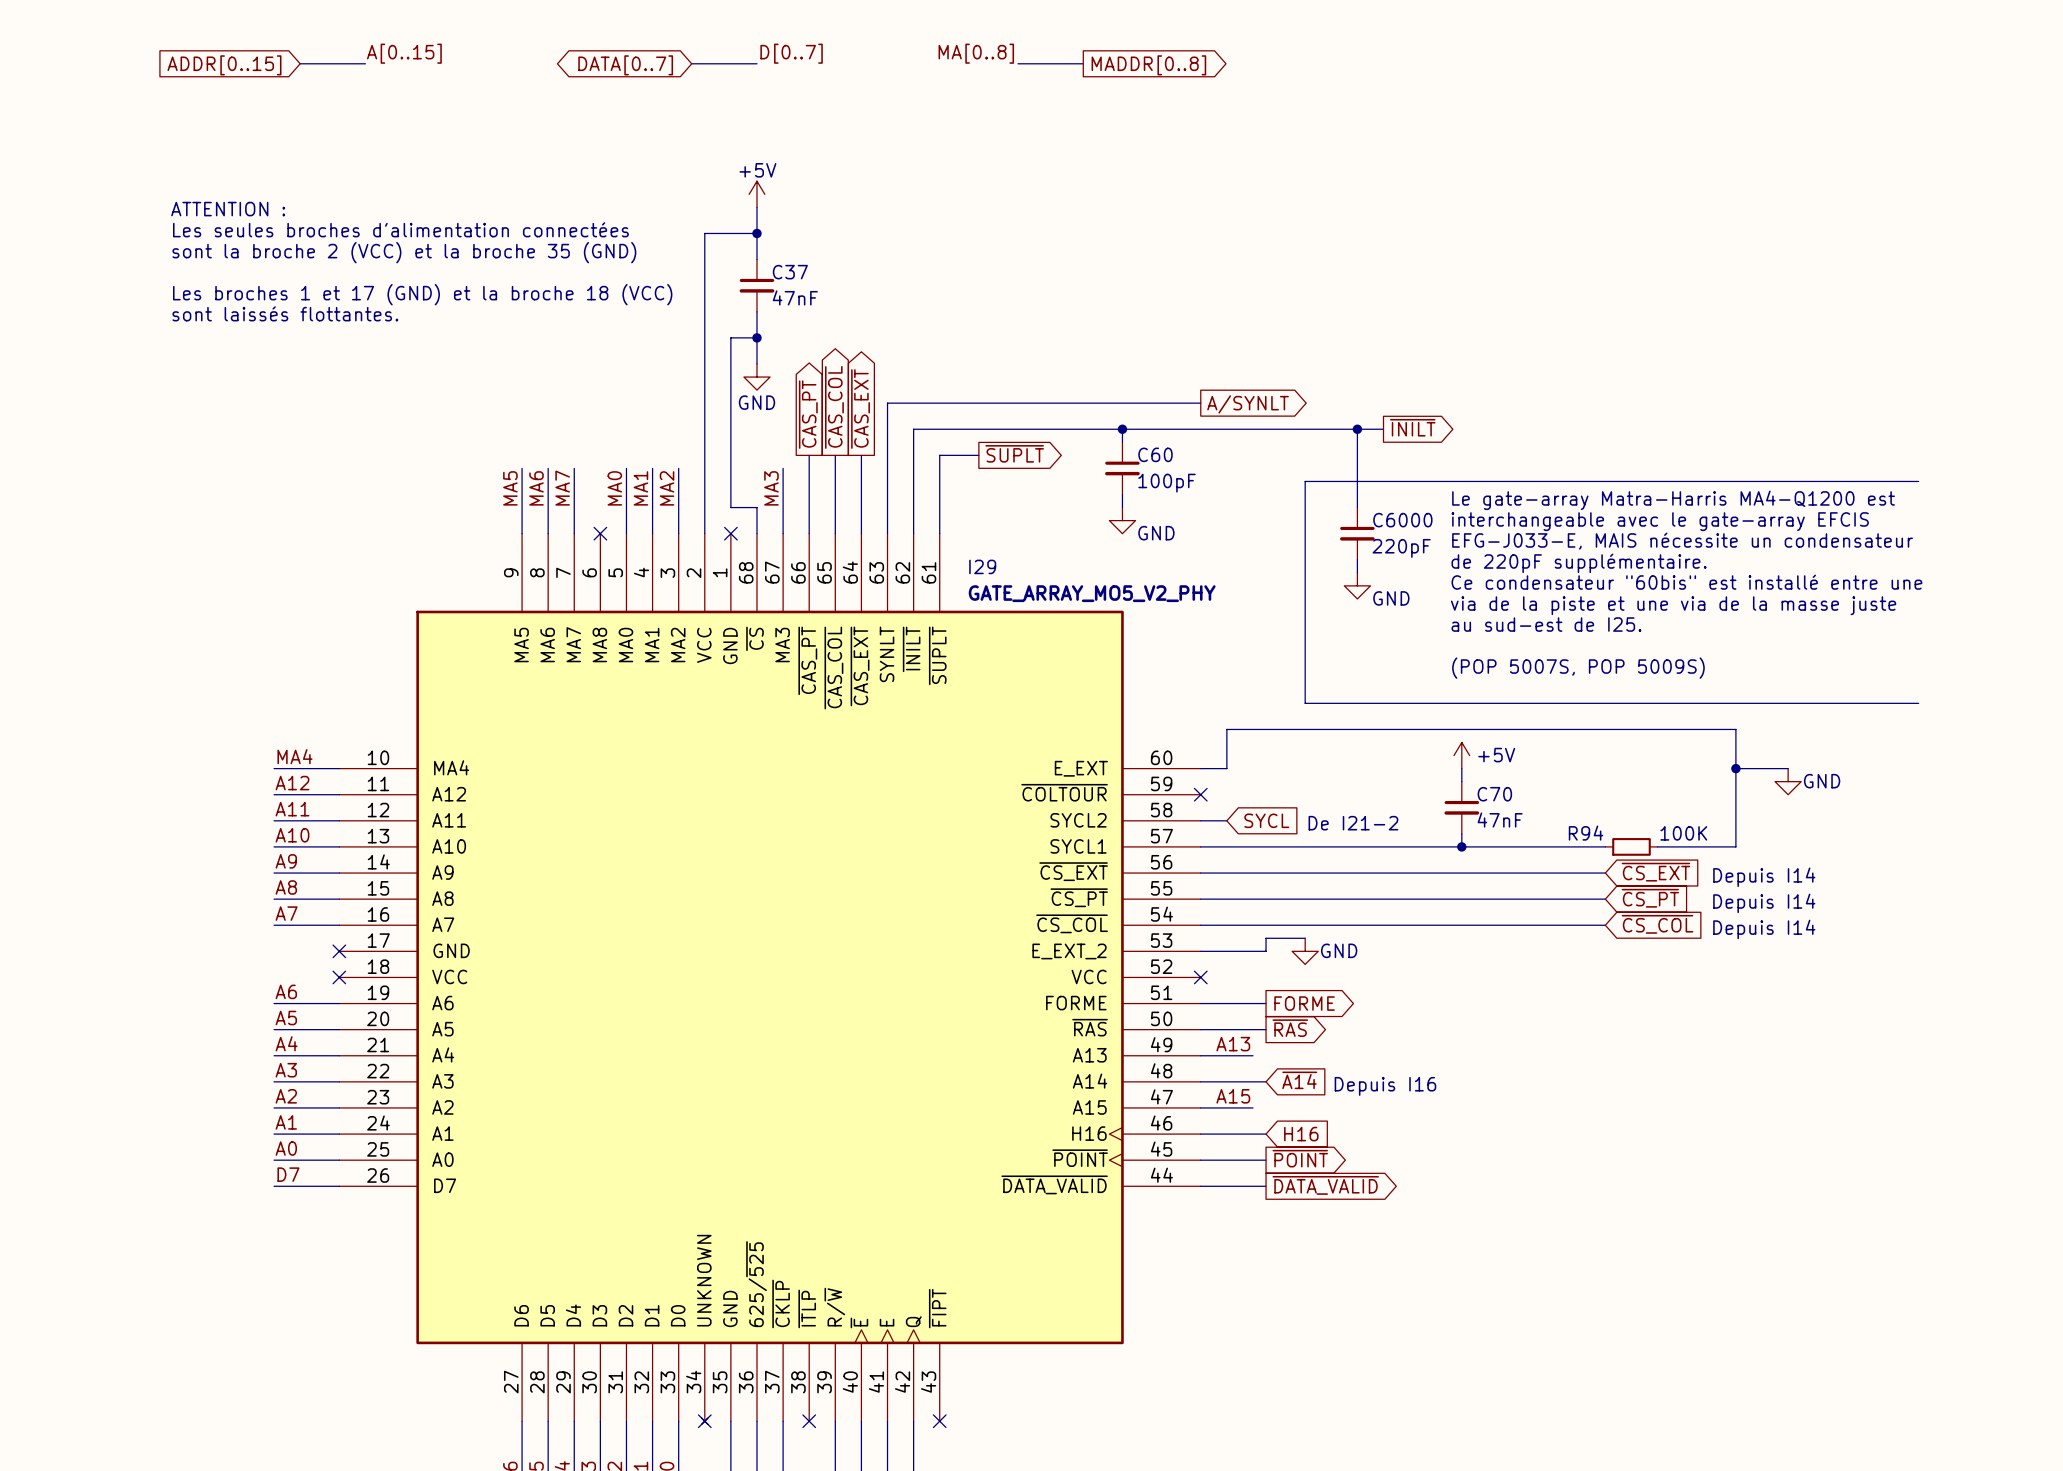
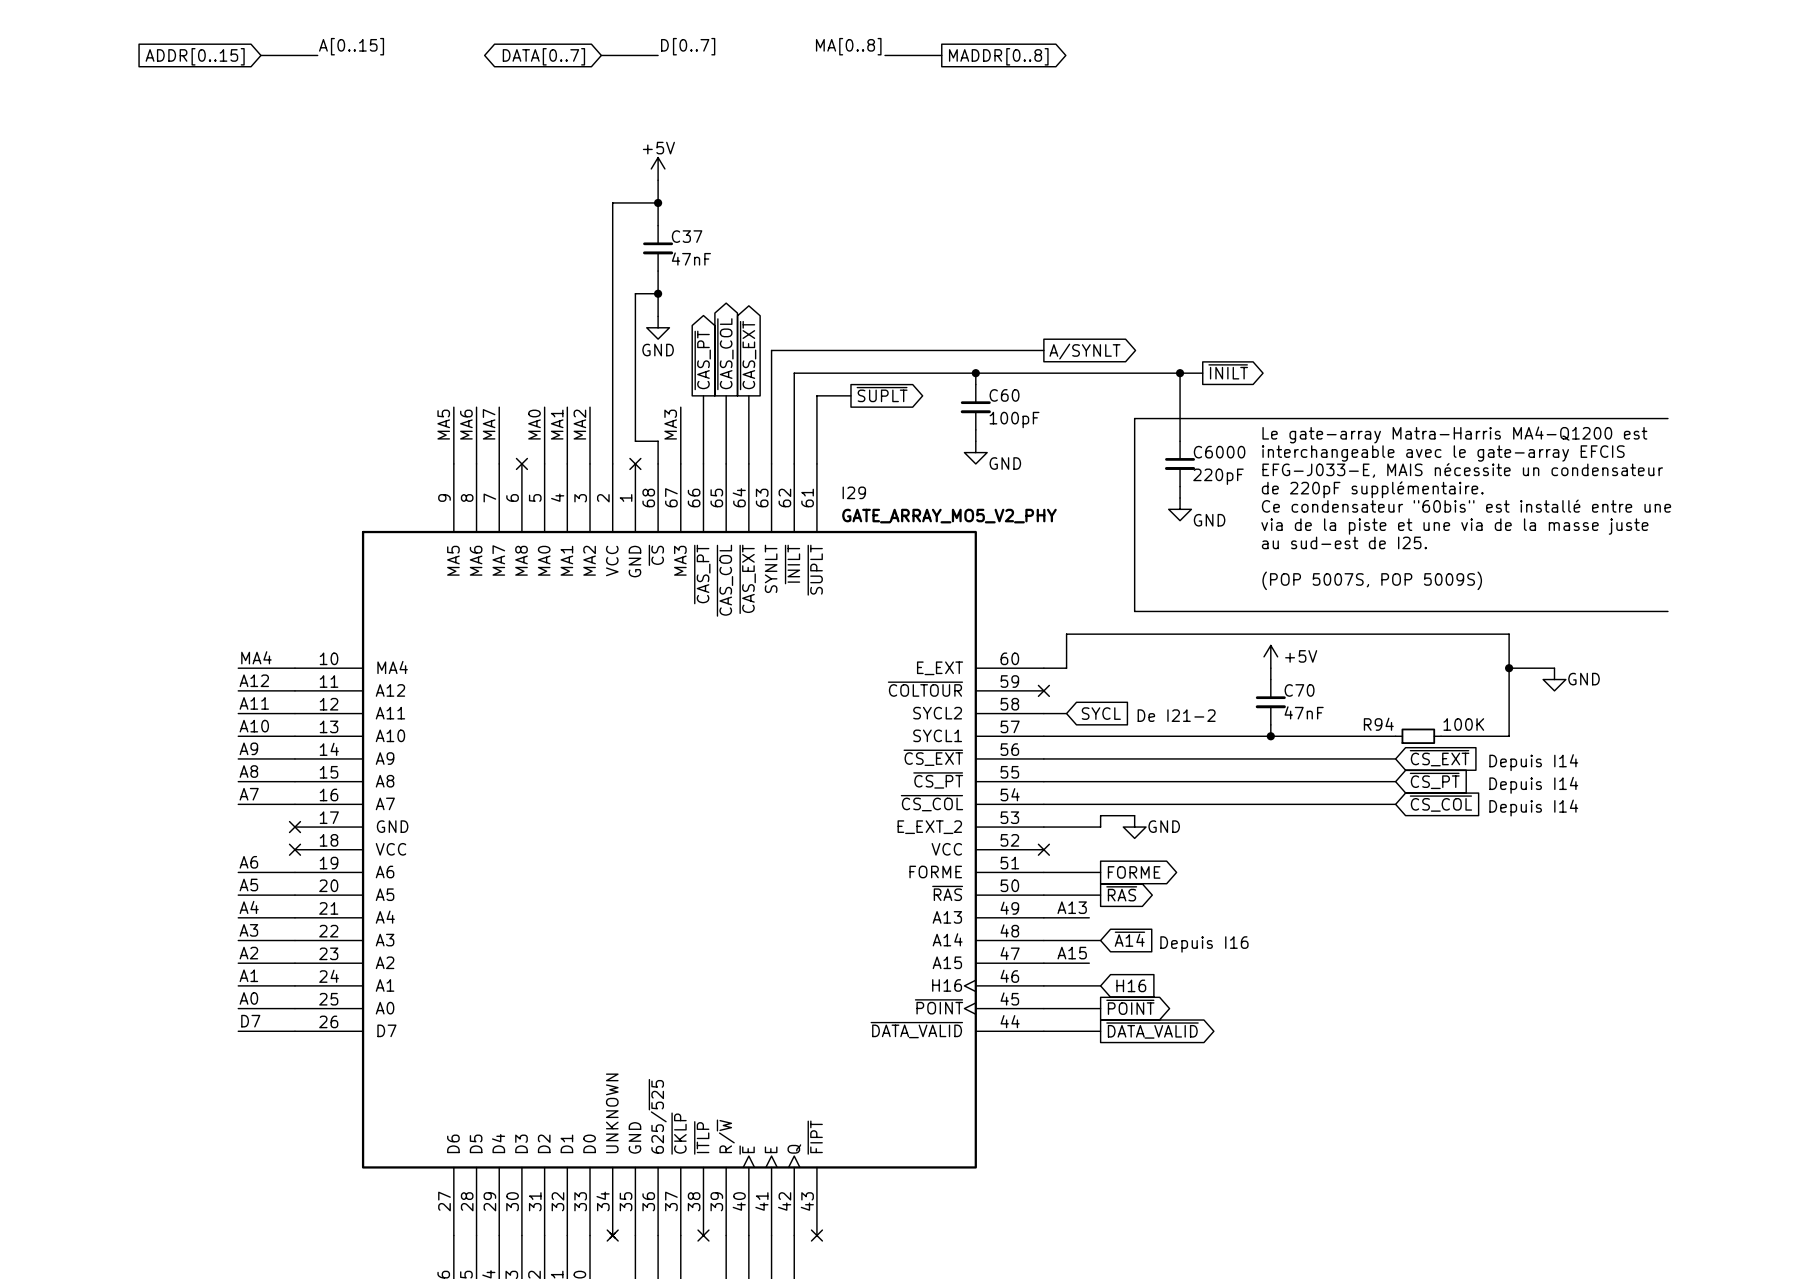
text: ATTENTION : (228, 209) -> none
text: Les seules broches d'alimentation connectées (400, 229) -> none
text: sont la broche 2 (VCC) et la broche 35 (GND) (404, 252) -> none
text: Les broches 1 et 17 (GND) et la broche 18 (VCC) (422, 294) -> none
text: sont laissés flottantes. (285, 313) -> none

